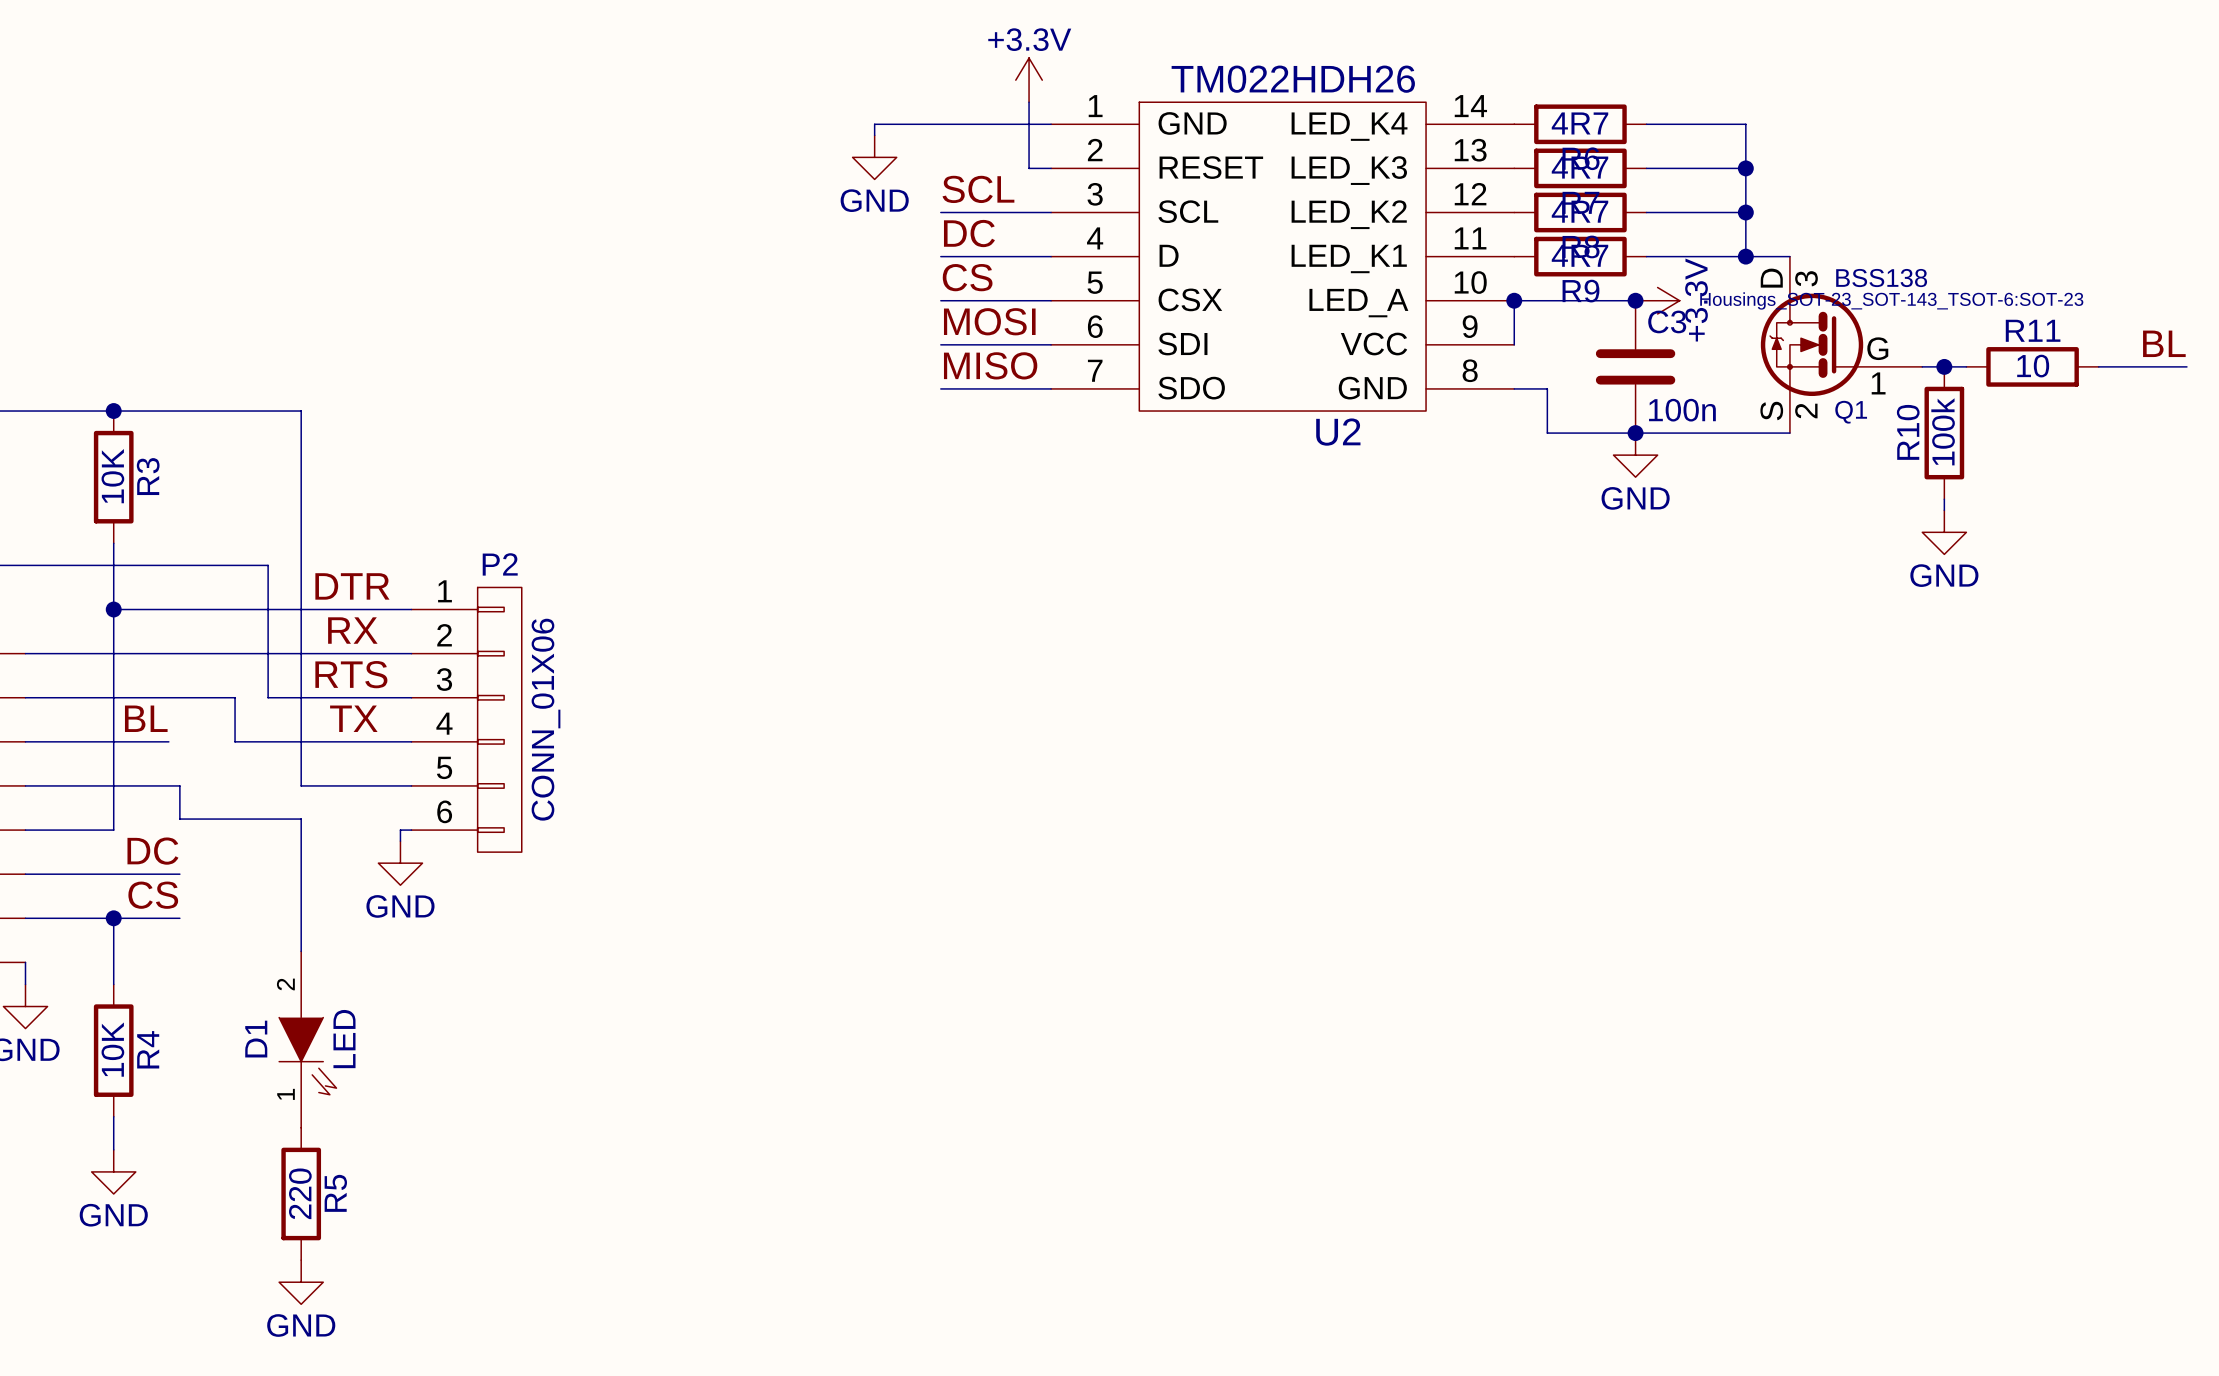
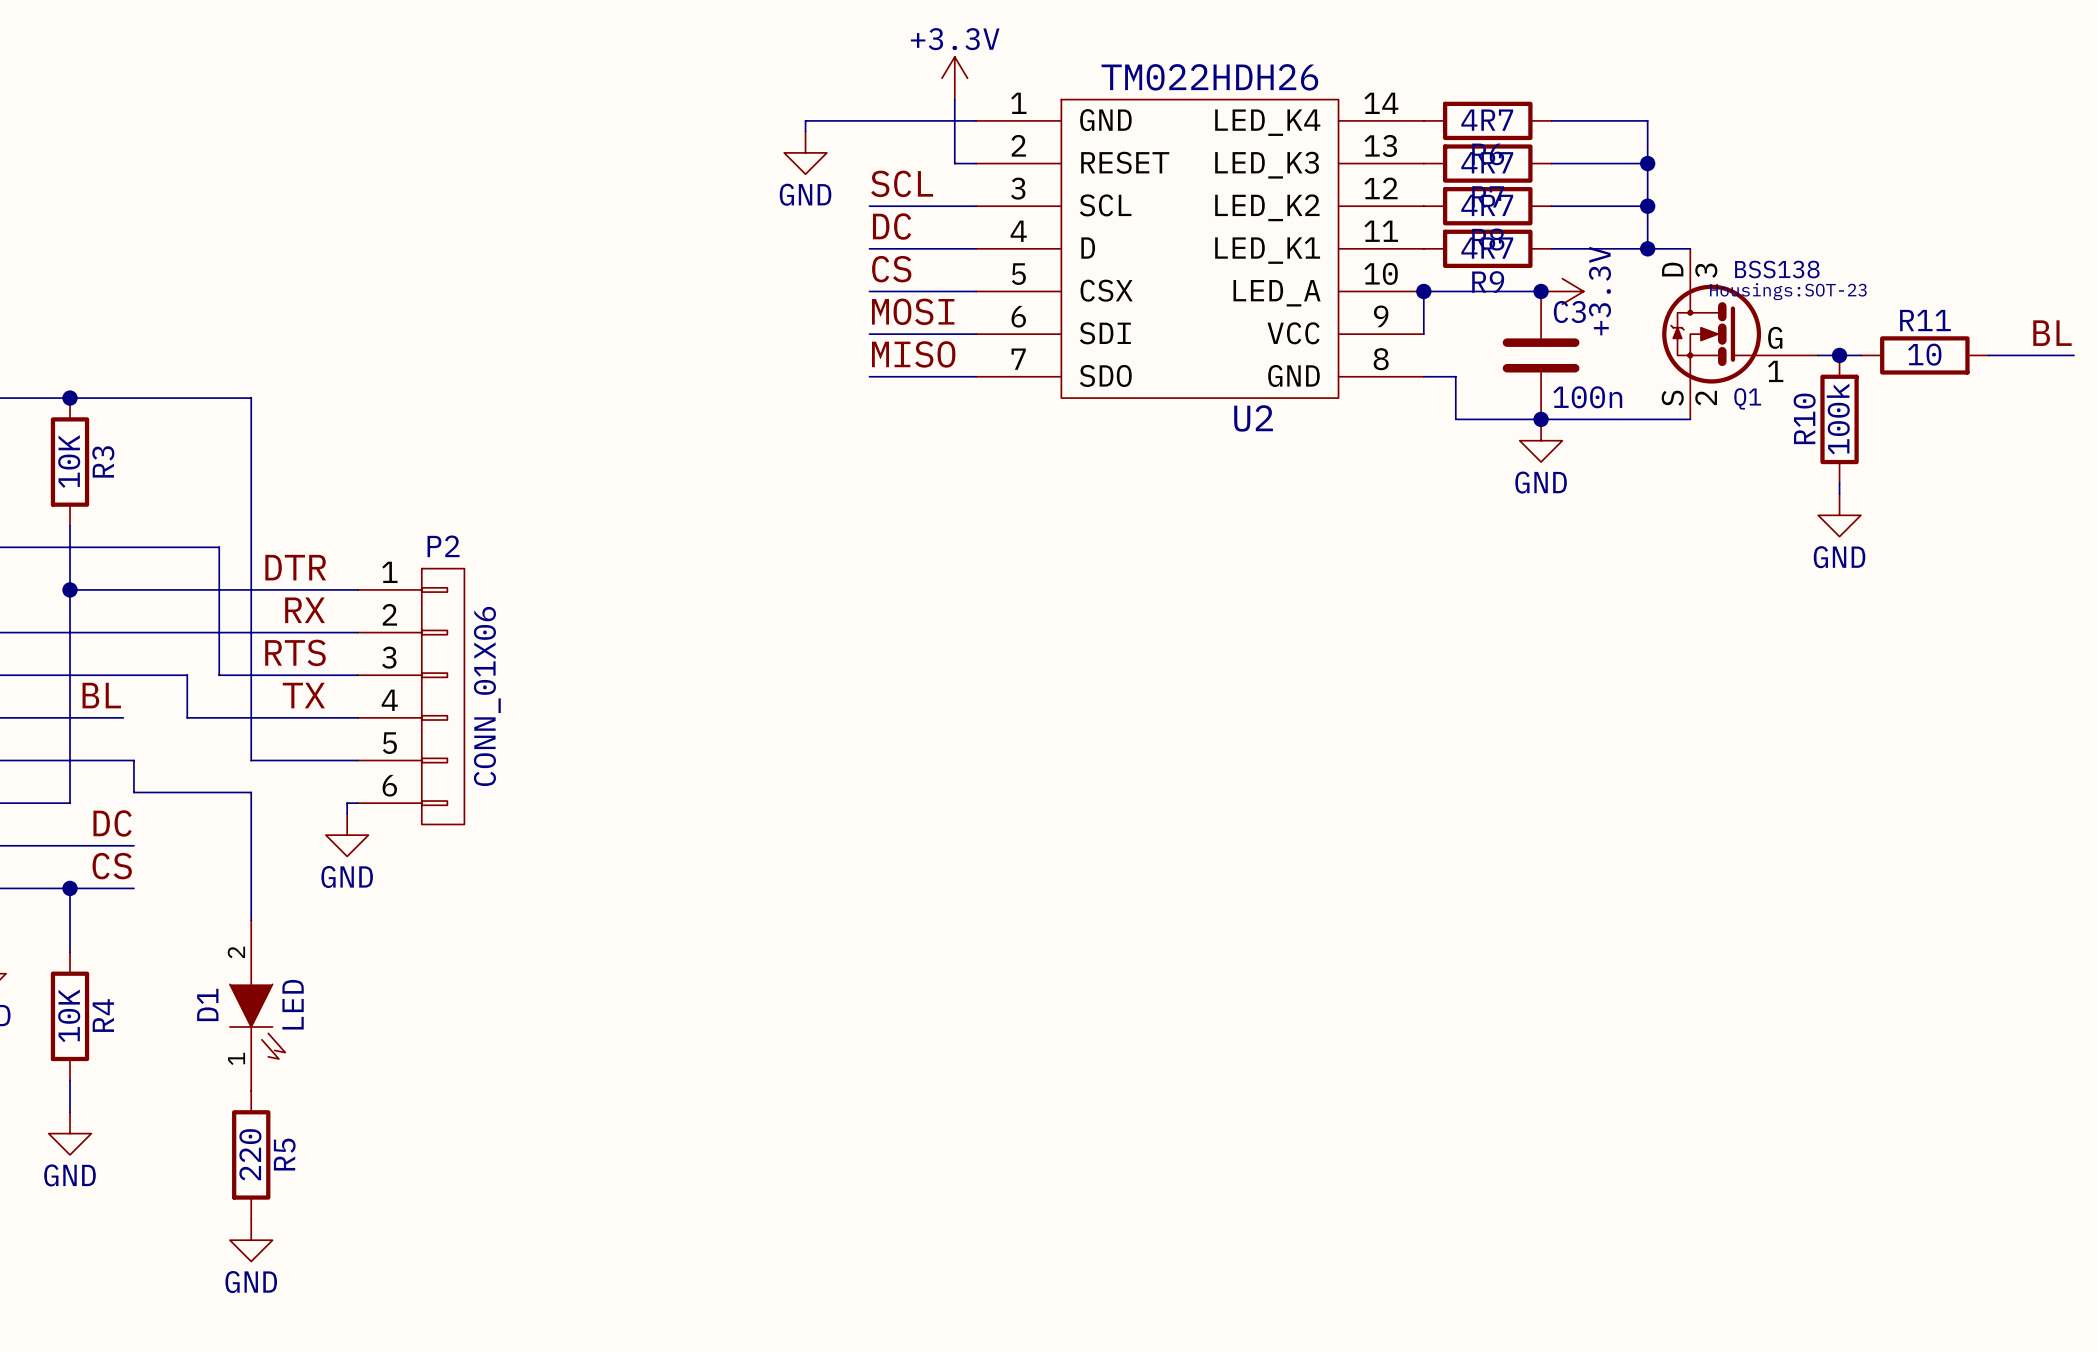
Q1 text: Housings_SOT-23_SOT-143_TSOT-6:SOT-23 (1891, 300) -> Housings:SOT-23 (1788, 291)

